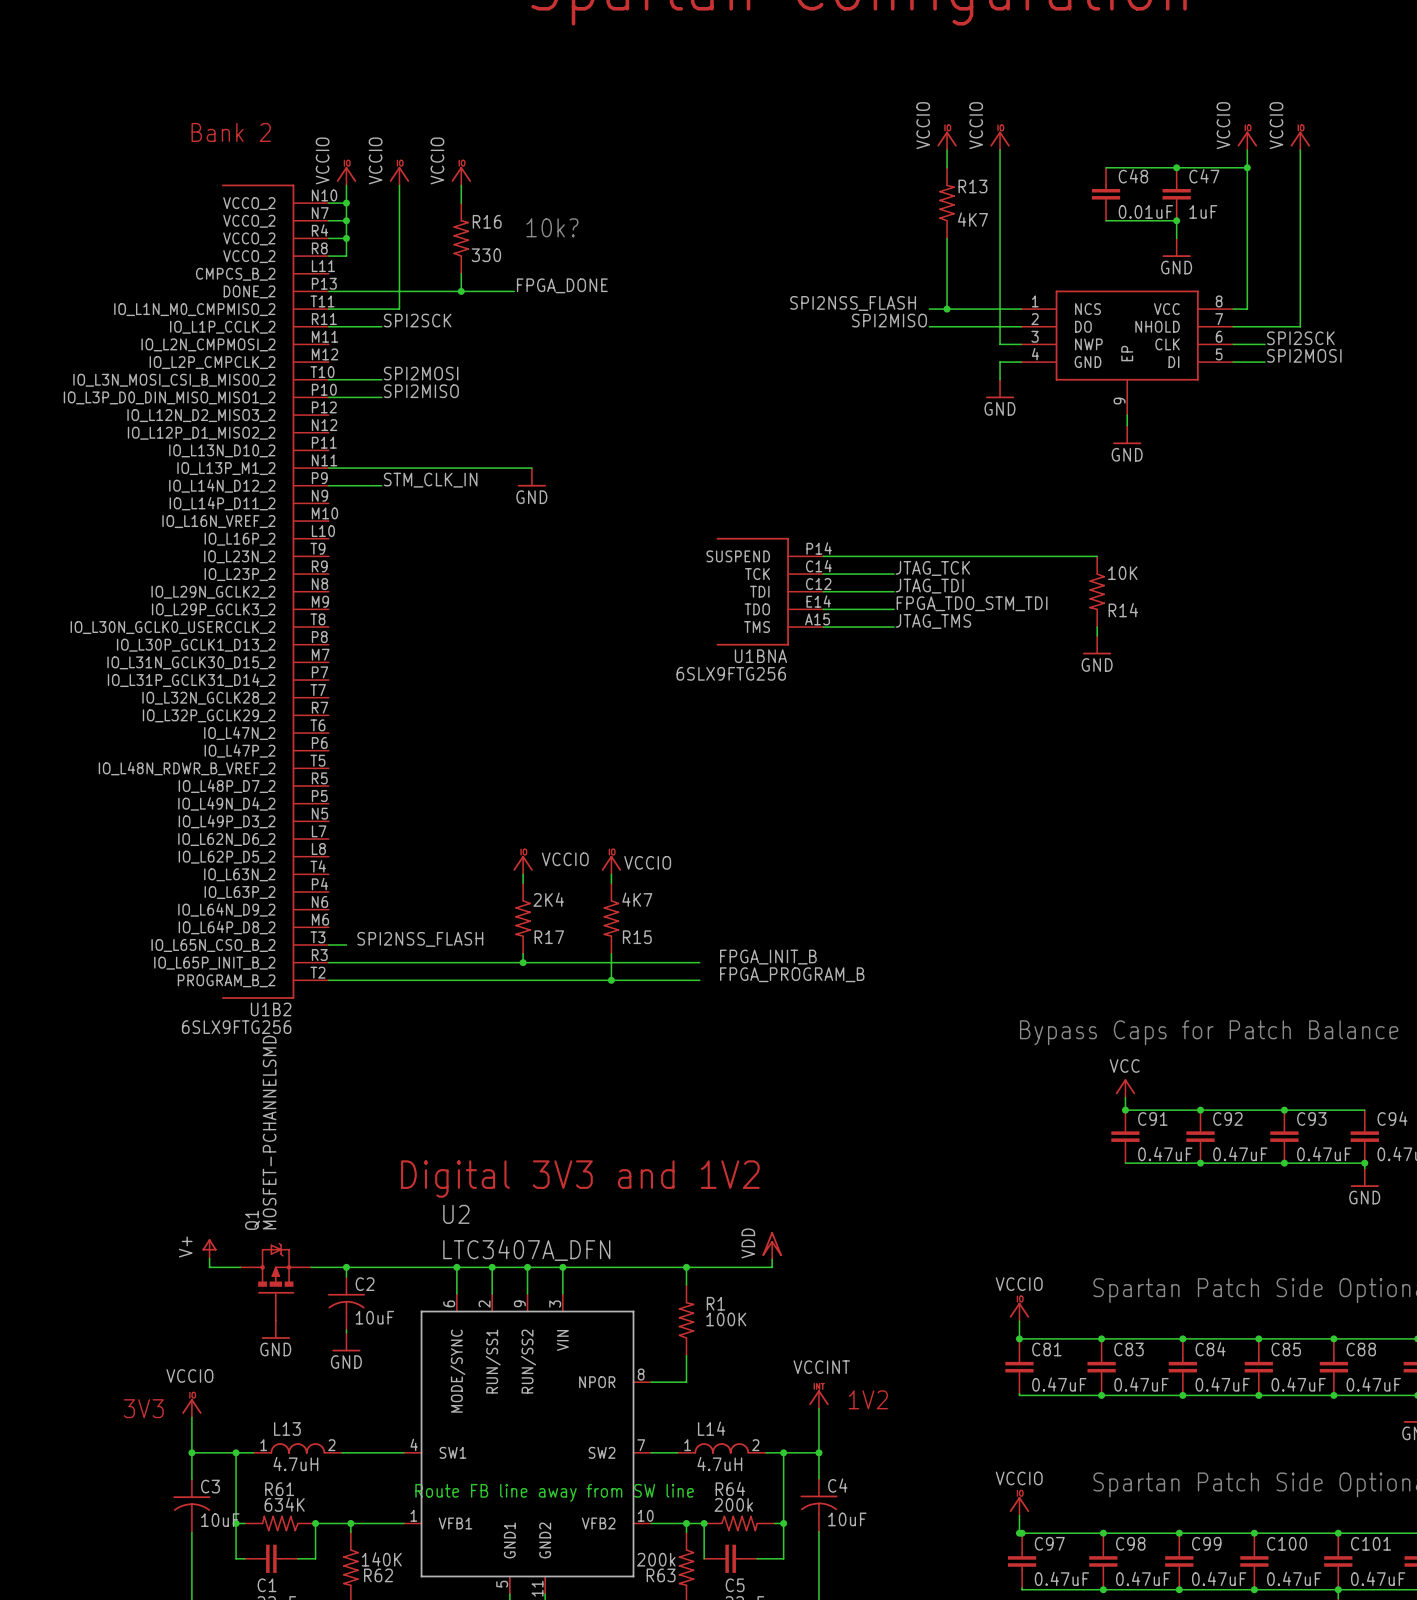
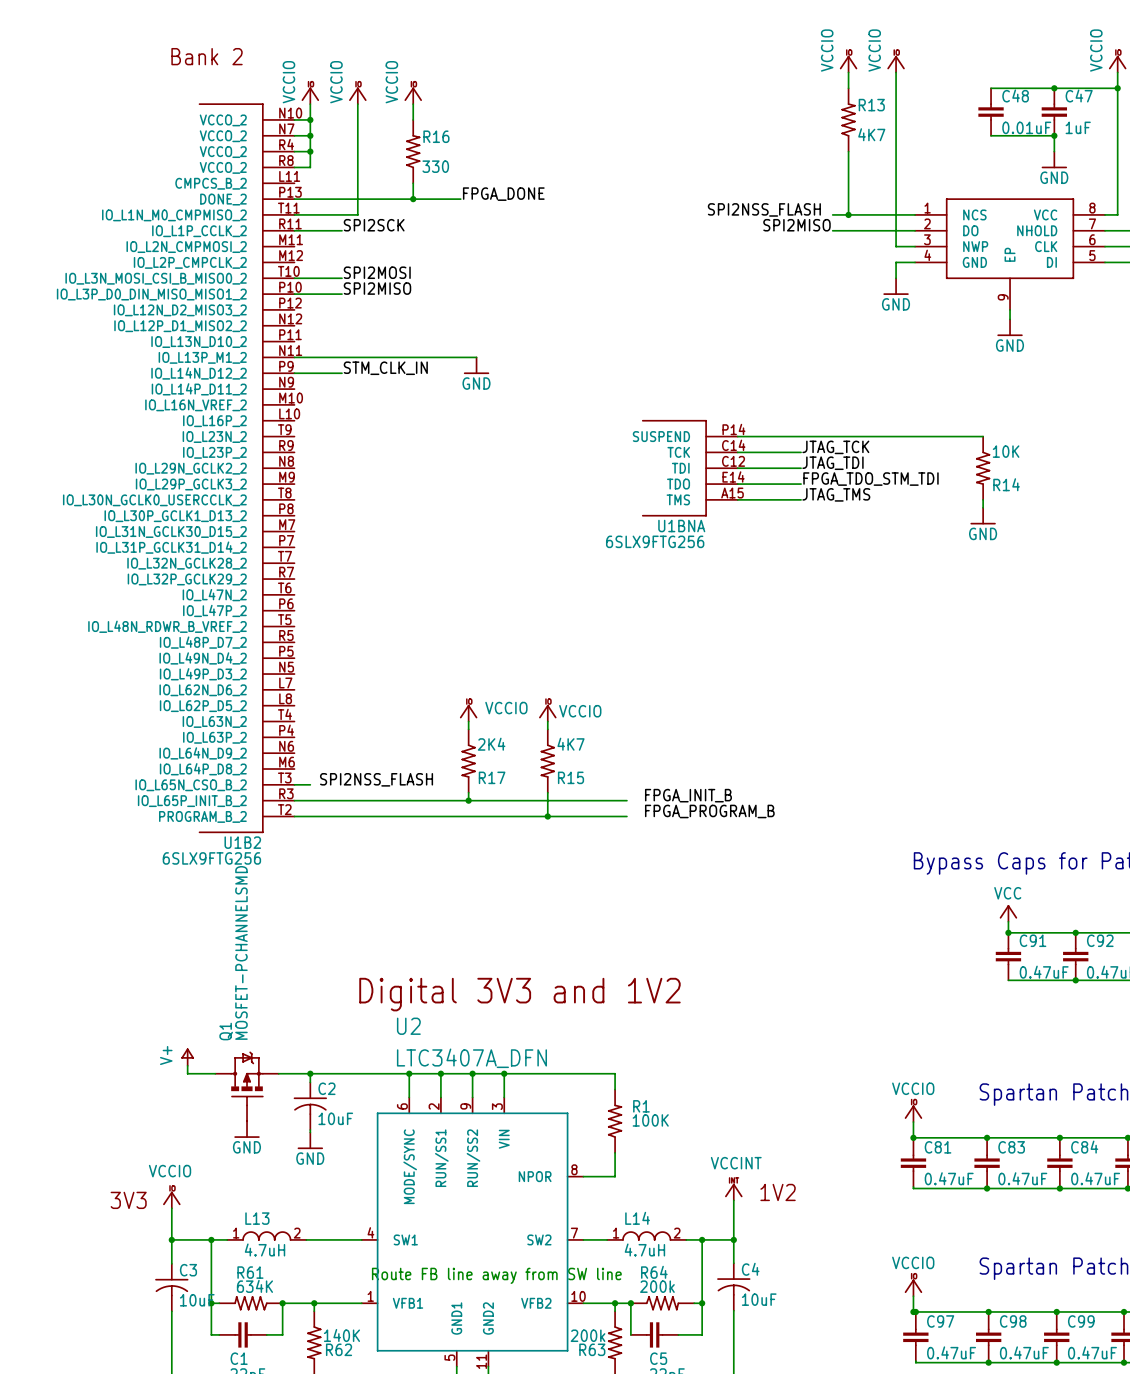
text: 10k? (552, 227) -> none
power symbol: VDD (772, 1245) -> none
wire: (772, 1259) (772, 1267) (686, 1267) -> none
junction: (686, 1267) -> none

